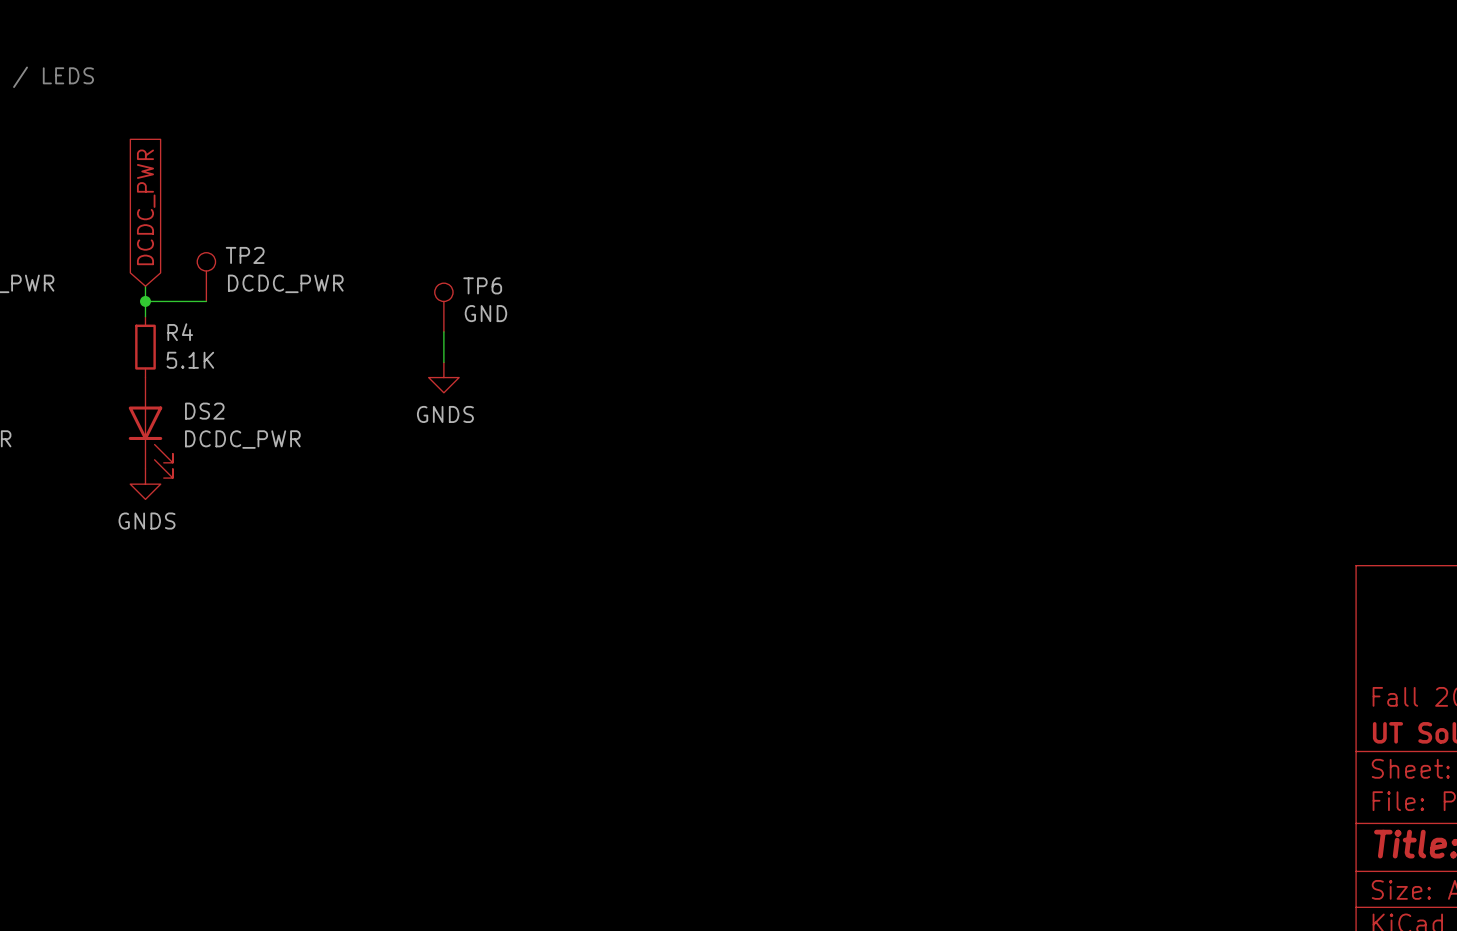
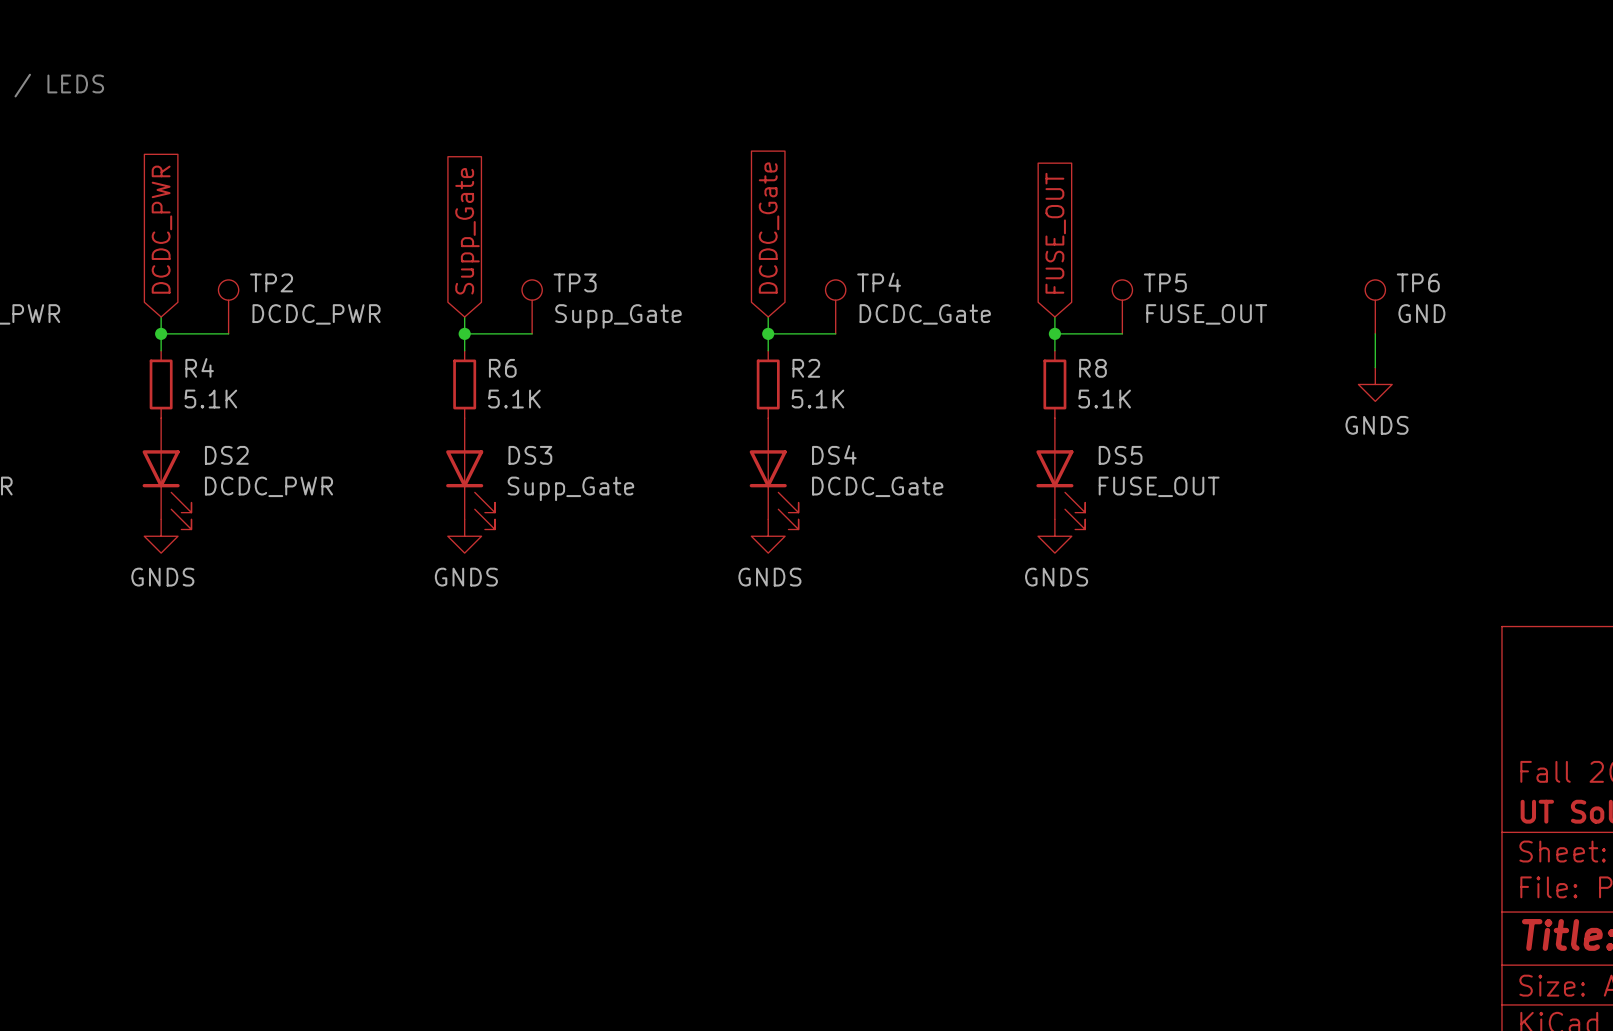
global label: none -> DCDC_Gate (769, 228)
global label: none -> Supp_Gate (467, 231)
global label: none -> FUSE_OUT (1055, 233)
TP3: none -> Supp_Gate (532, 306)
TP4: none -> DCDC_Gate (835, 306)
TP5: none -> FUSE_OUT (1122, 306)
wire: none -> (768, 317) (768, 350)
wire: none -> (1054, 317) (1054, 350)
wire: none -> (464, 333) (532, 333)
junction: none -> (464, 333)
wire: none -> (768, 333) (835, 333)
junction: none -> (768, 333)
wire: none -> (1054, 333) (1122, 333)
junction: none -> (1054, 333)
wire: none -> (1375, 333) (1375, 367)
TP6 position: (443, 307) -> (1375, 306)
wire: (443, 331) (443, 362) -> (464, 317) (464, 350)
R6: none -> 5.1K (464, 384)
R2: none -> 5.1K (768, 384)
R8: none -> 5.1K (1054, 384)
power symbol: none -> GNDS (1375, 384)
power symbol position: GNDS (443, 377) -> GNDS (464, 536)
DS3: none -> Supp_Gate (470, 473)
DS4: none -> DCDC_Gate (774, 473)
DS5: none -> FUSE_OUT (1060, 473)
power symbol: none -> GNDS (768, 536)
power symbol: none -> GNDS (1054, 536)

